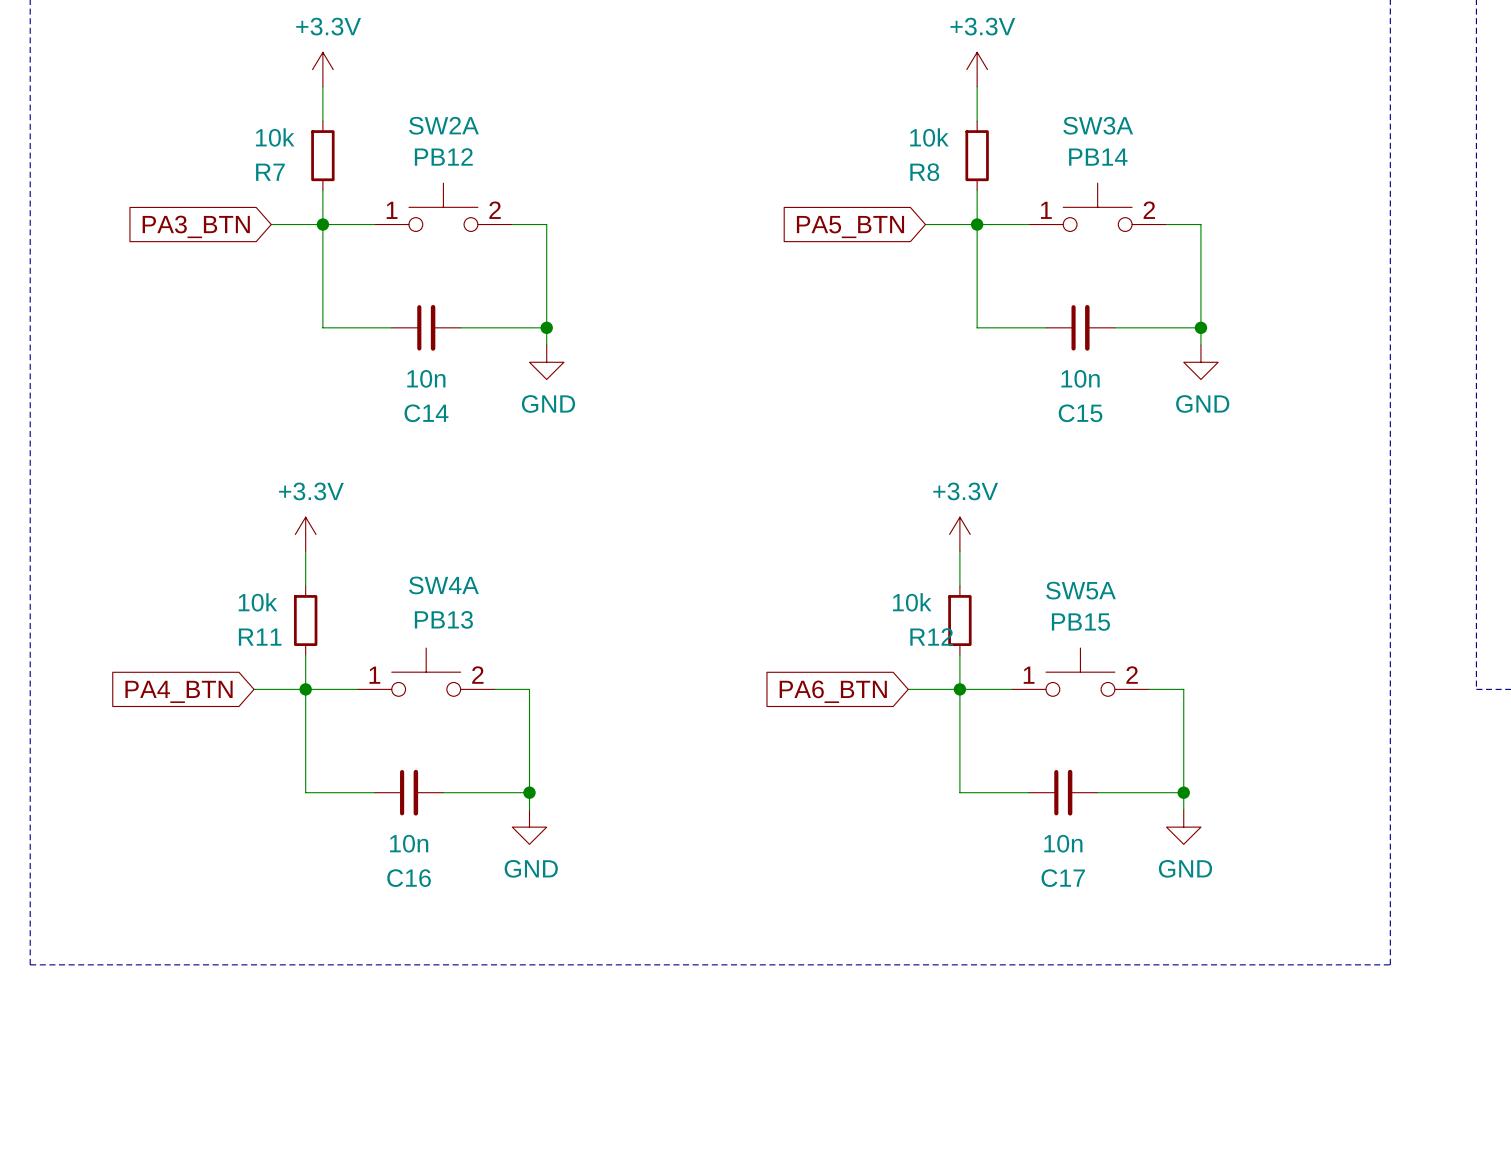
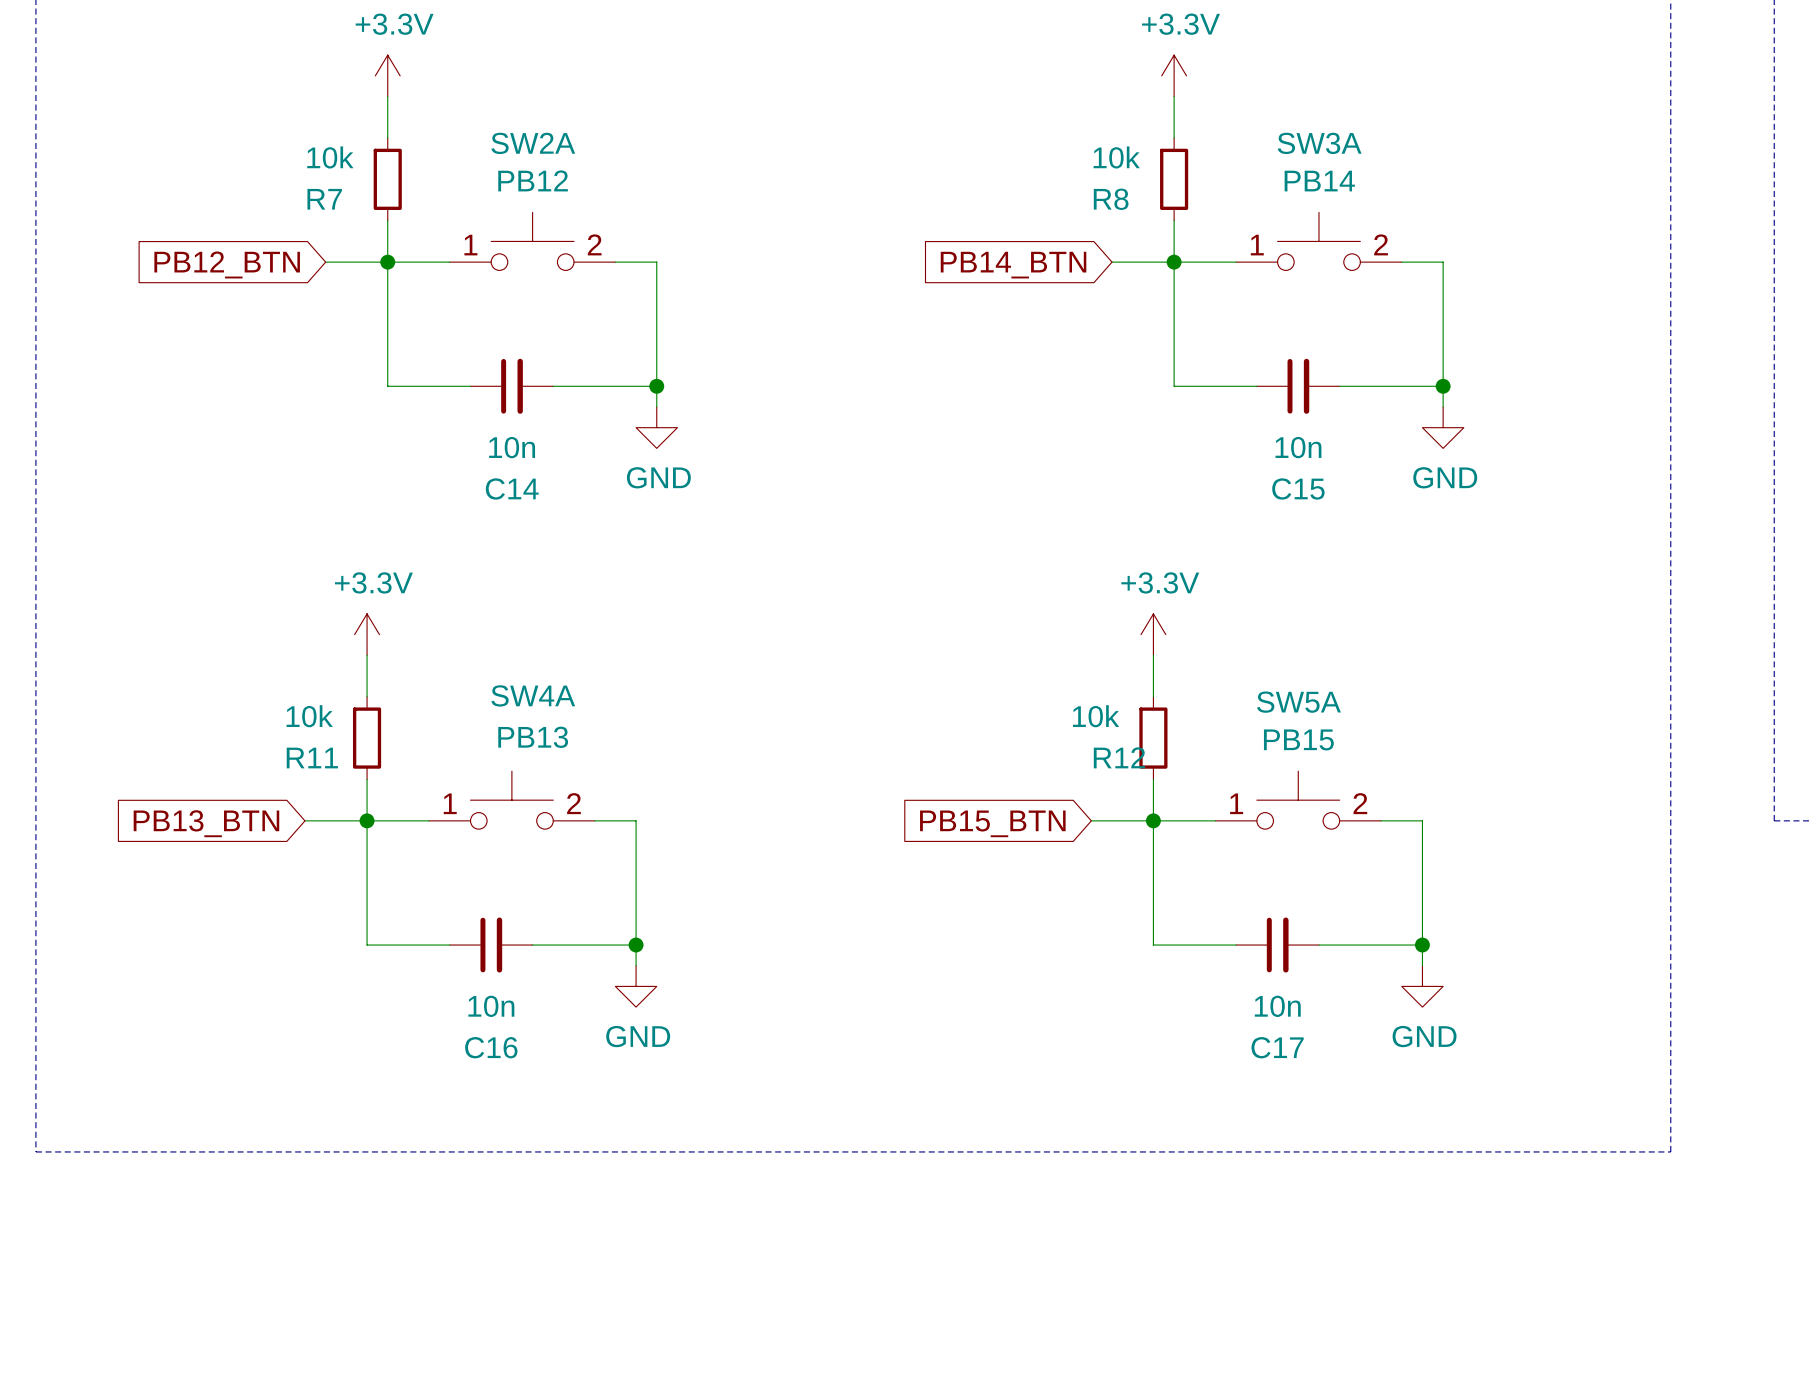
global label: PA3_BTN (196, 226) -> PB12_BTN (227, 264)
global label: PA5_BTN (850, 227) -> PB14_BTN (1013, 265)
global label: PA4_BTN (179, 691) -> PB13_BTN (206, 823)
global label: PA6_BTN (833, 691) -> PB15_BTN (992, 823)

